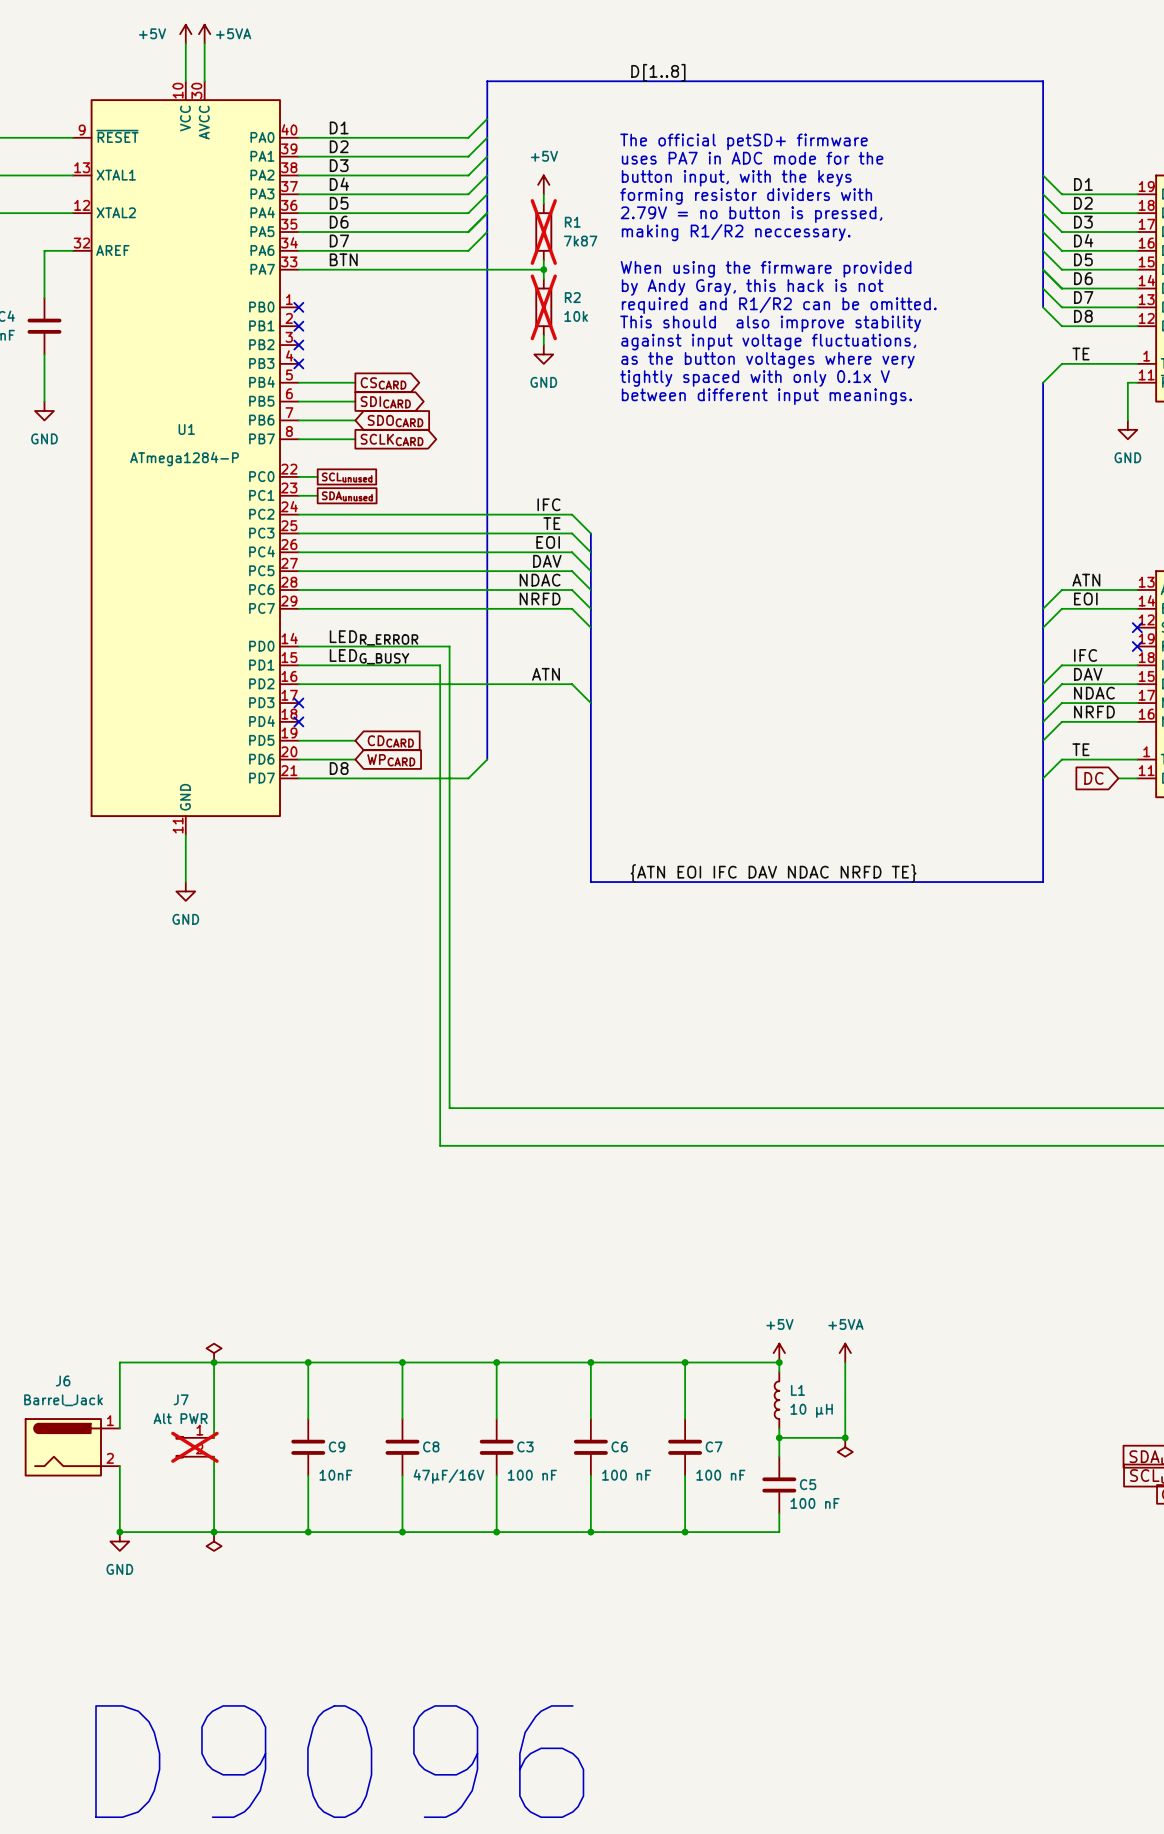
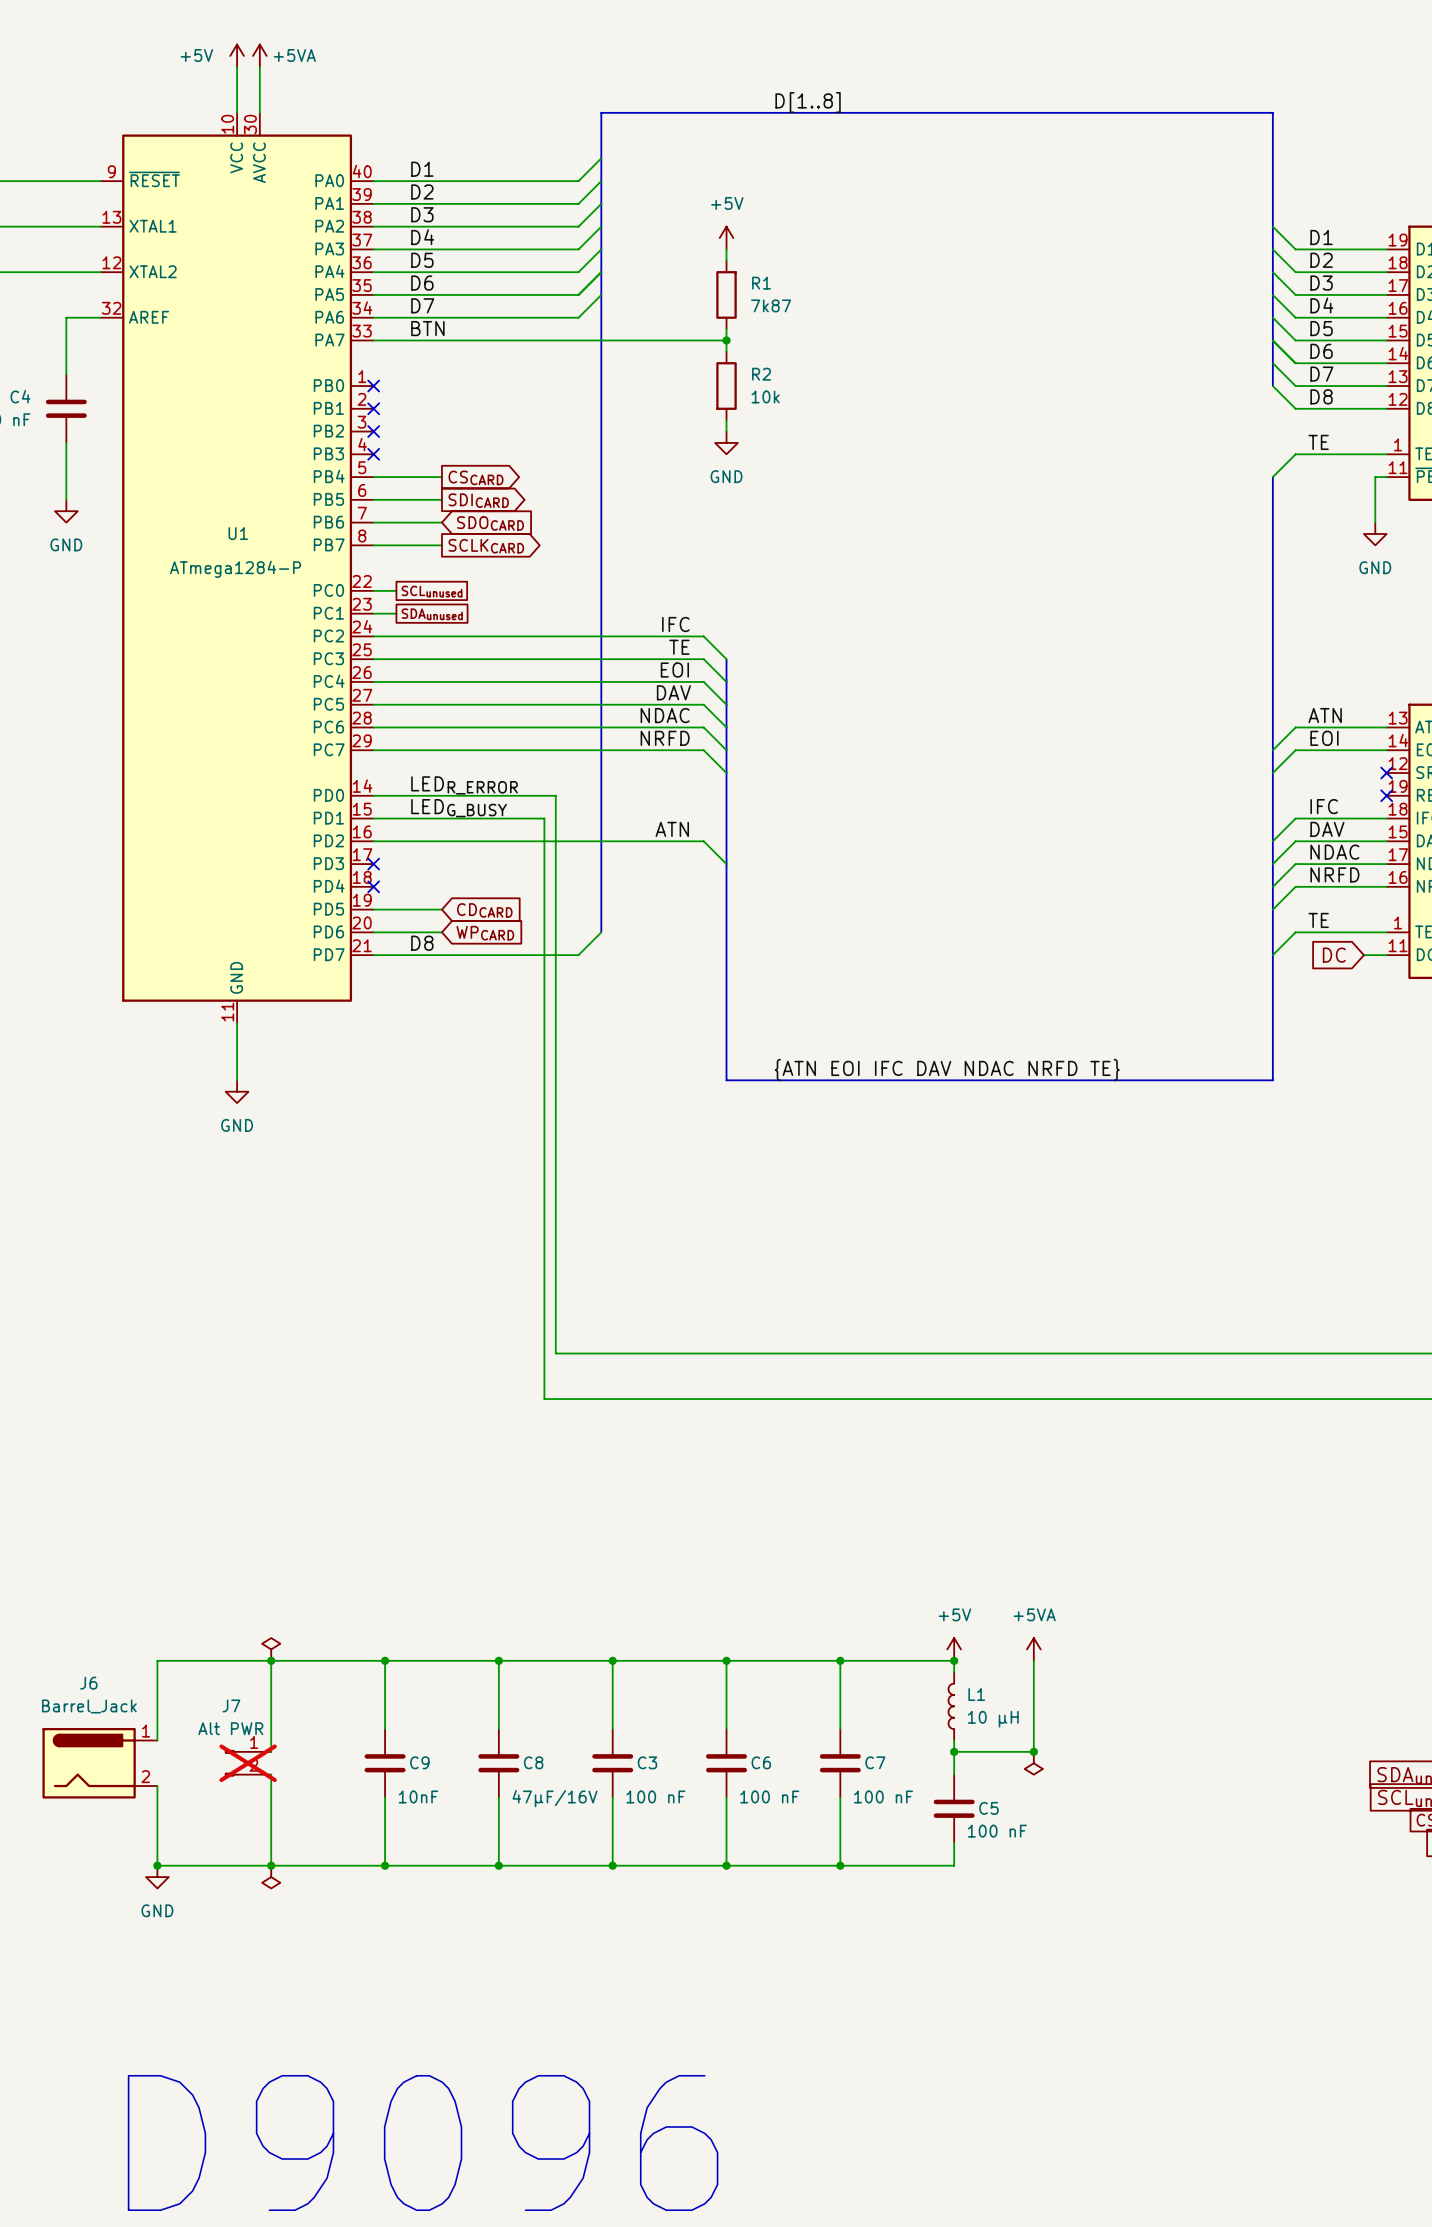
text: The official petSD+ firmware (743, 141) -> none
text: uses PA7 in ADC mode for the (752, 158) -> none
text: button input, with the keys (736, 178) -> none
power symbol position: +5V (543, 184) -> +5V (726, 238)
wire: (543, 194) (543, 203) -> (726, 249) (726, 260)
text: forming resistor dividers with (746, 196) -> none
text: 2.79V = no button is pressed, (751, 214) -> none
R1 position: (543, 232) -> (726, 294)
R1 do-not-place cross: (543, 232) -> none
text: making R1/R2 neccessary. (736, 232) -> none
wire: (543, 260) (543, 279) -> (726, 329) (726, 351)
wire: none -> (669, 340) (726, 340)
junction: (543, 269) -> none
junction: none -> (726, 340)
text: When using the firmware provided (766, 269) -> none
text: by Andy Gray, this hack is not (752, 287) -> none
text: required and R1/R2 can be omitted. (779, 305) -> none
R2 position: (543, 307) -> (726, 386)
R2 do-not-place cross: (543, 307) -> none
text: This should also improve stability (770, 323) -> none
wire: (543, 335) (543, 345) -> (726, 420) (726, 431)
text: against input voltage fluctuations, (768, 342) -> none
power symbol position: GND (543, 354) -> GND (726, 442)
text: as the button voltages where very (767, 360) -> none
text: tightly spaced with only 0.1x V (755, 378) -> none
text: between different input meanings. (766, 396) -> none

